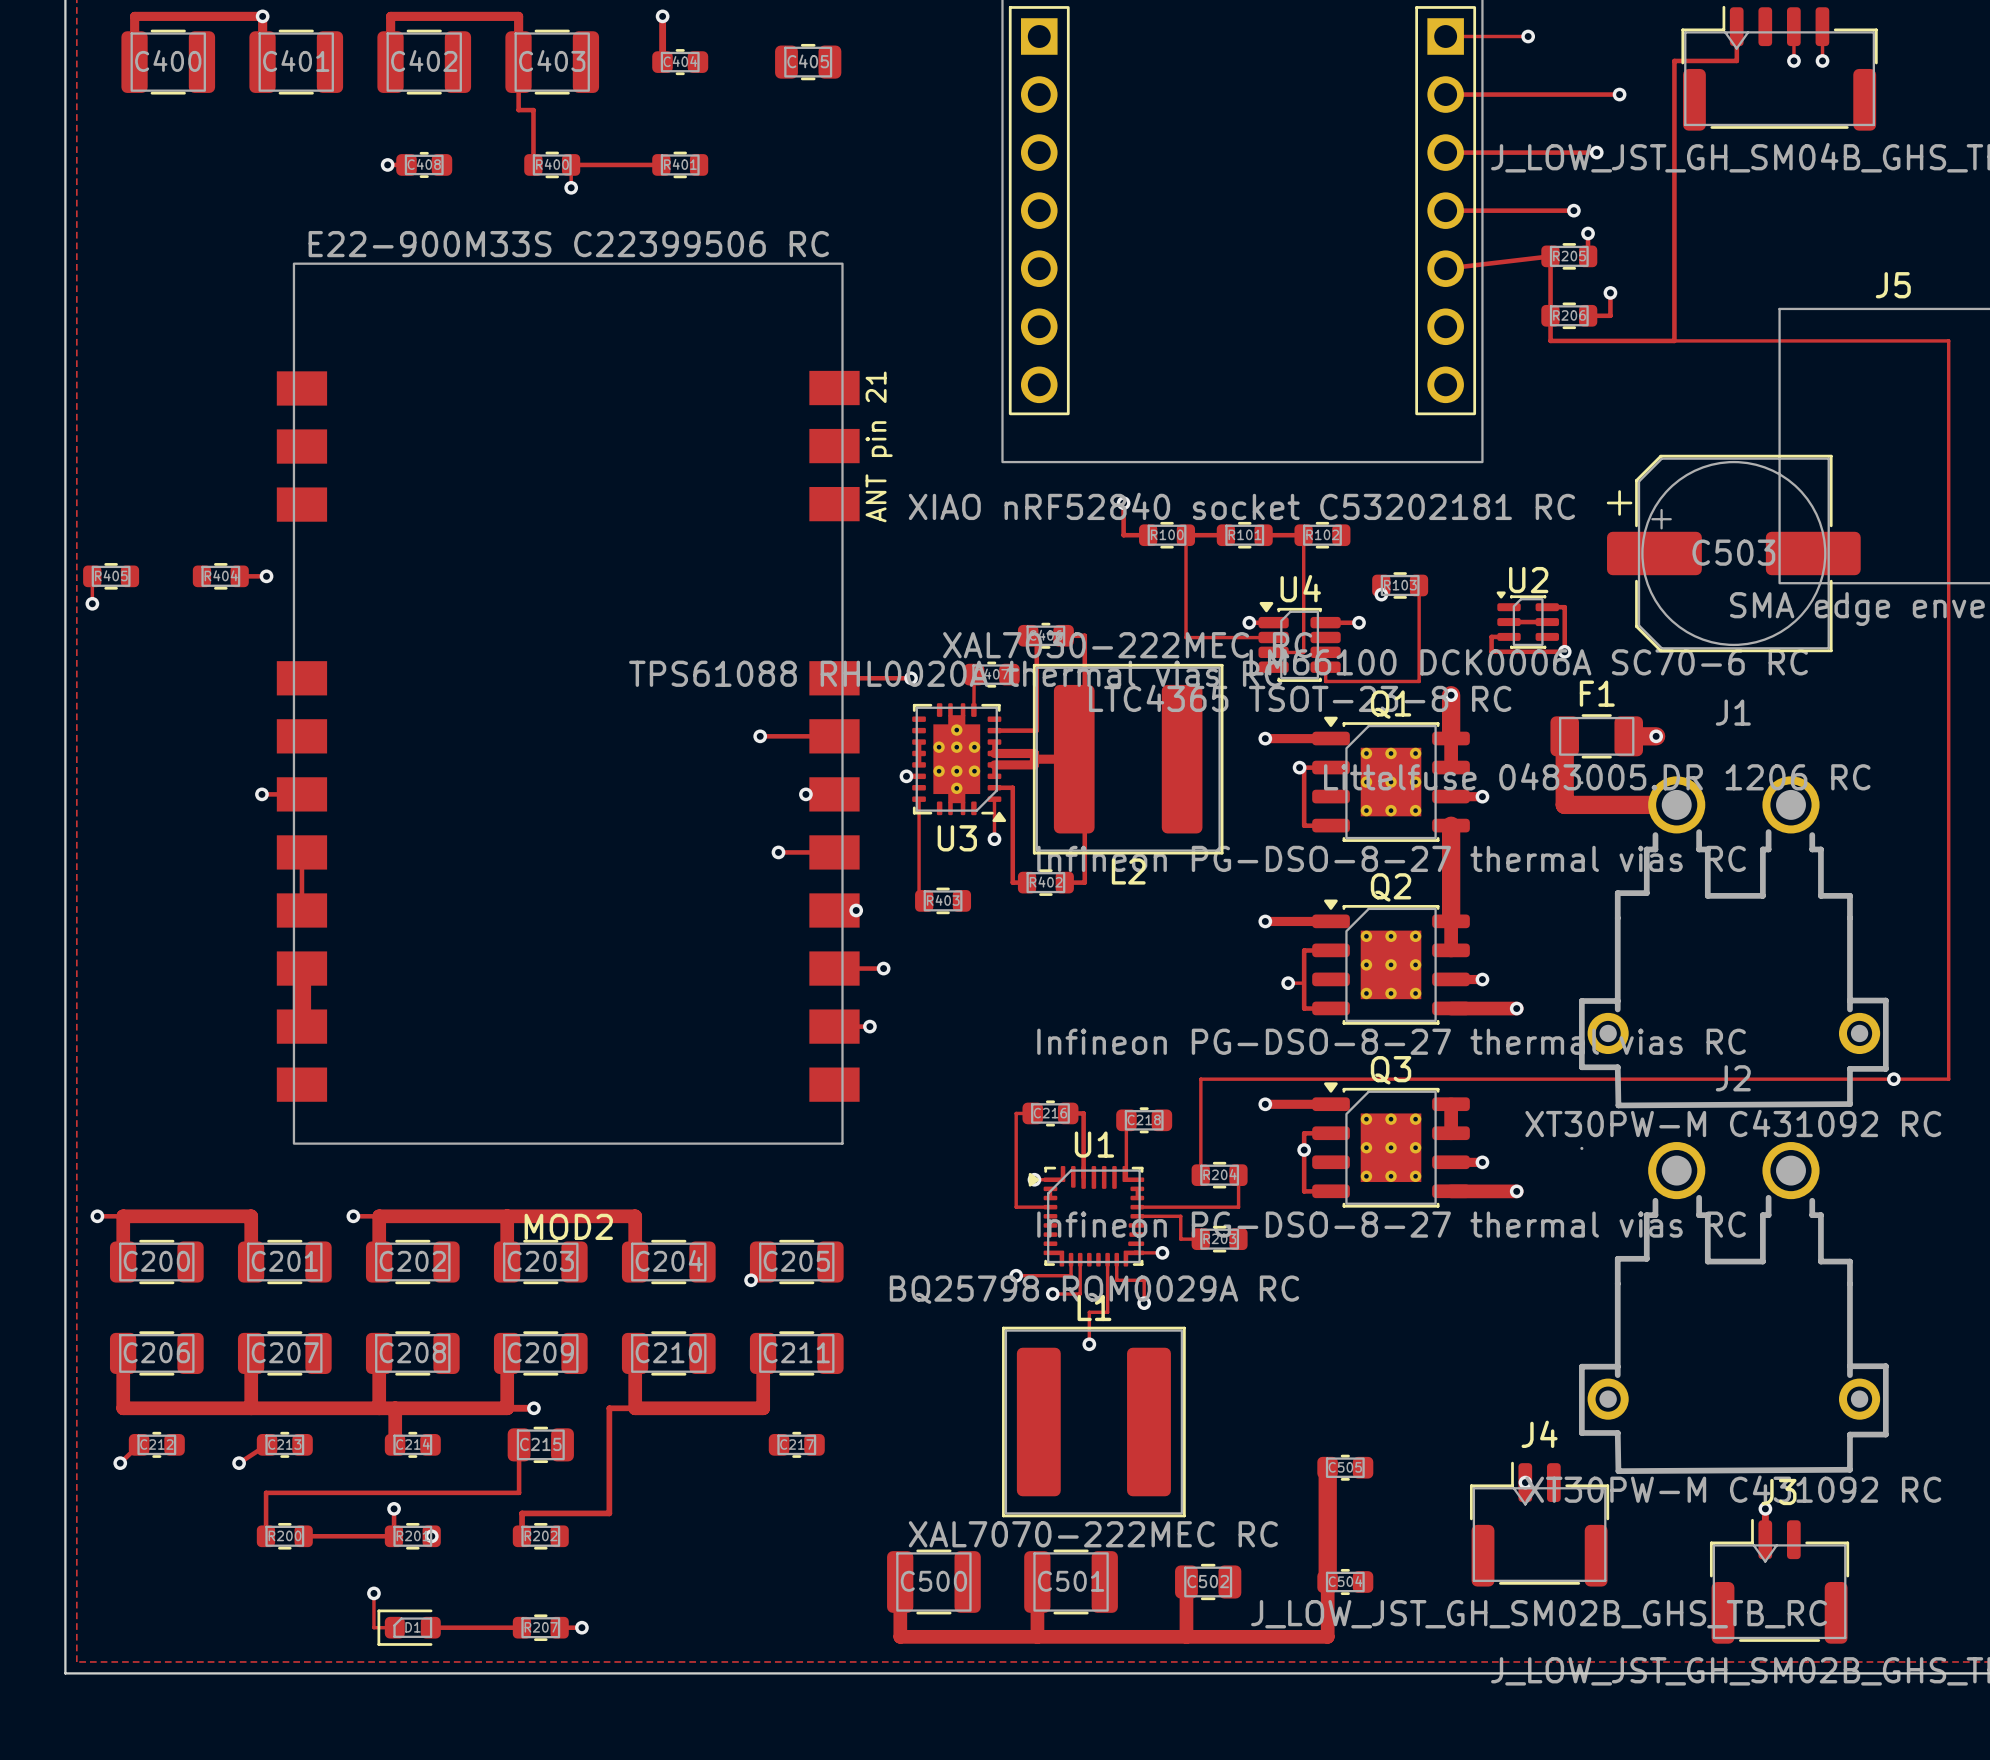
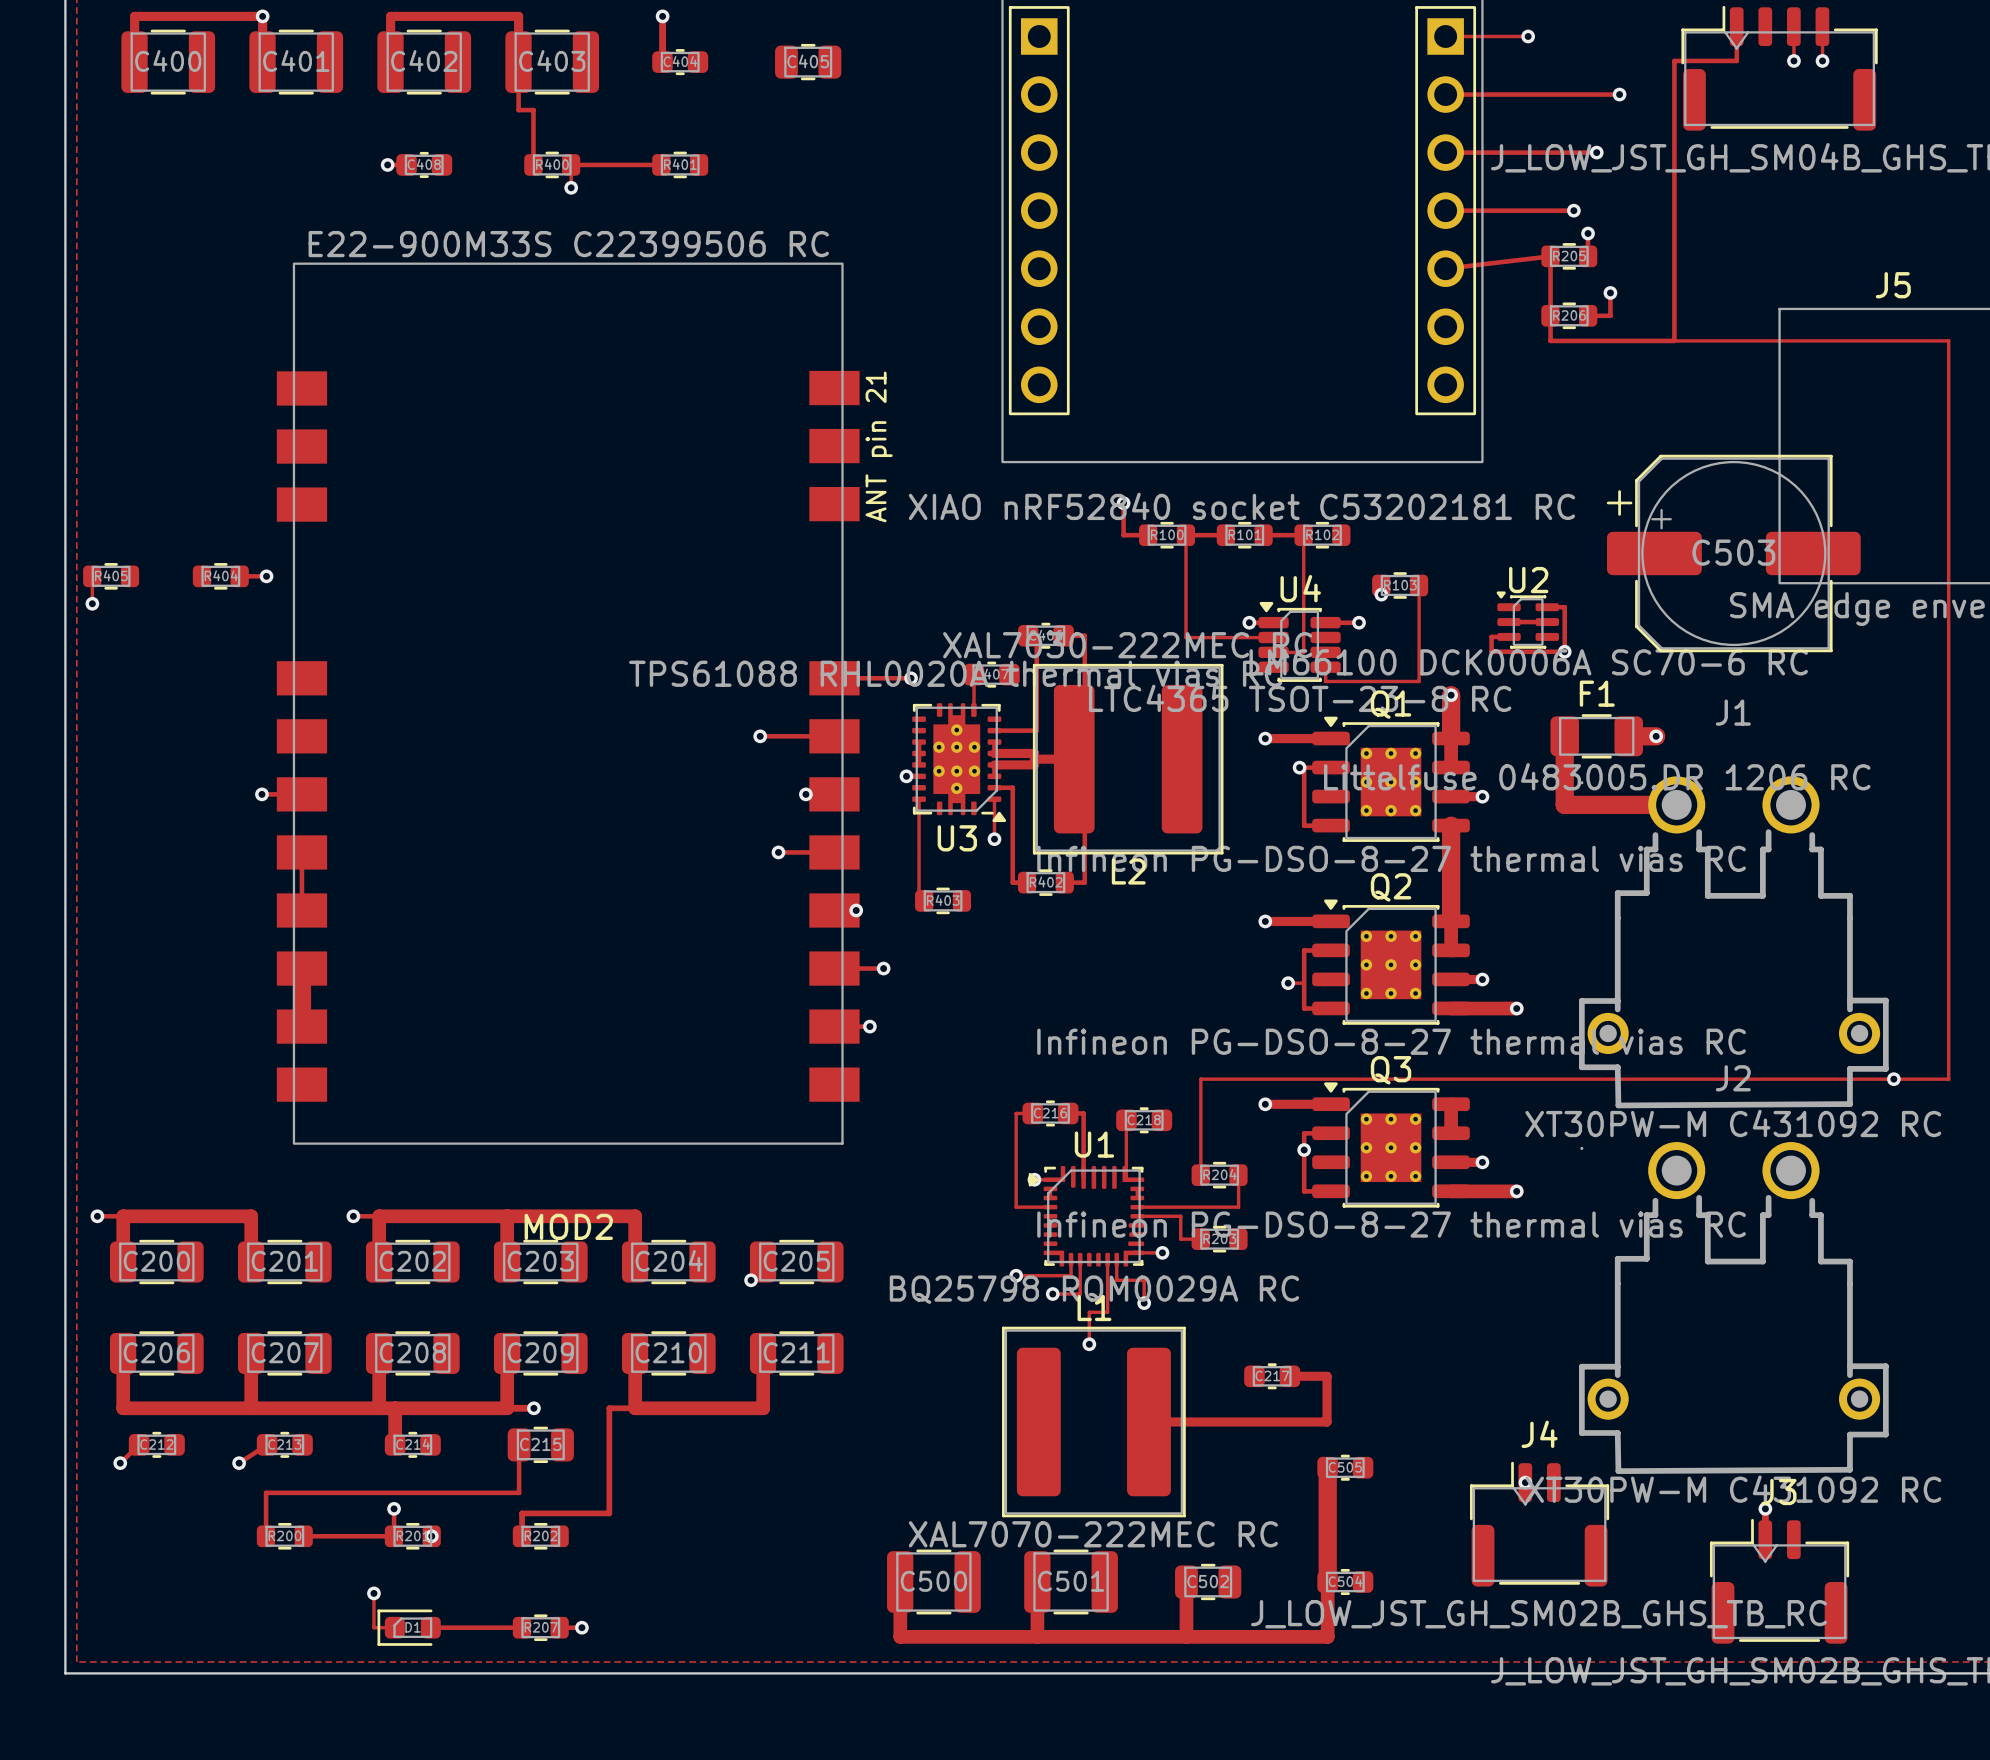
track: none -> (1290, 1376) (1327, 1376) (1327, 1422) (1148, 1422)
C217 position: (796, 1444) -> (1272, 1376)

